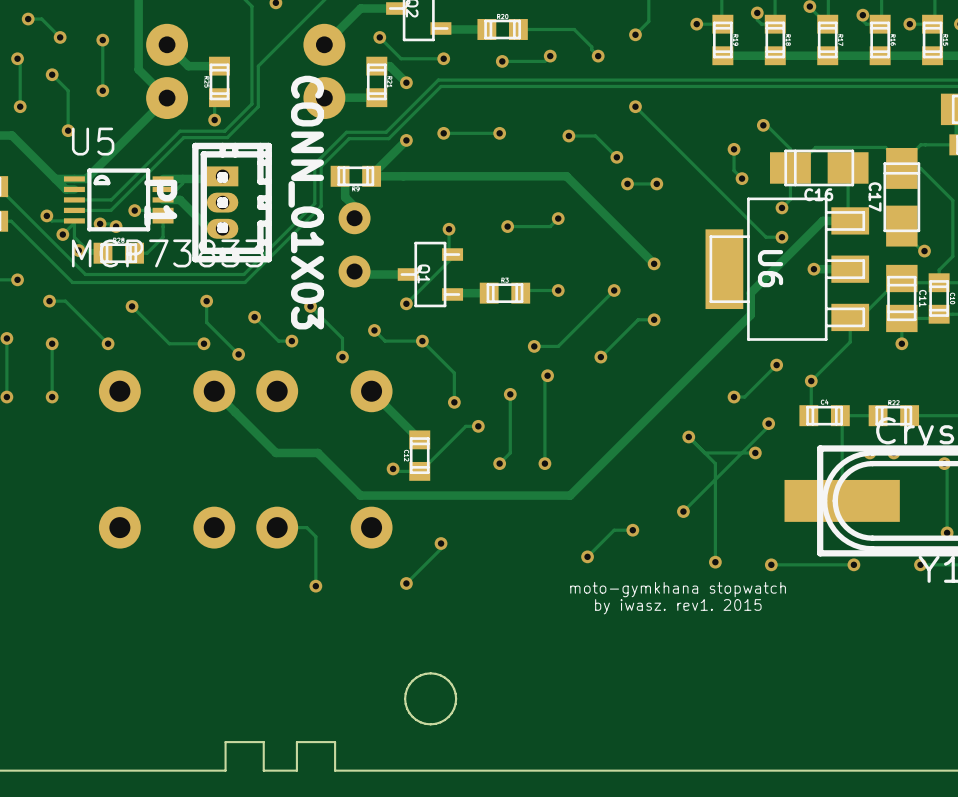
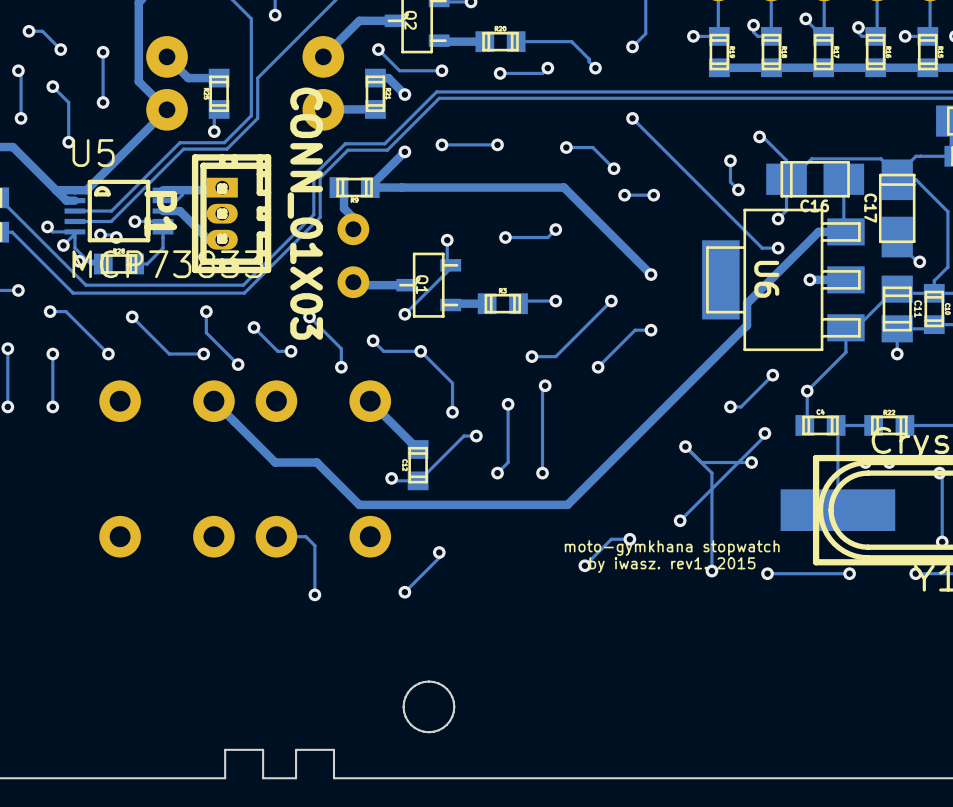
text position: moto-gymkhana stopwatch (678, 589) -> moto-gymkhana stopwatch (672, 548)
text position: by iwasz. rev1. 2015 (678, 606) -> by iwasz. rev1. 2015 (672, 565)

